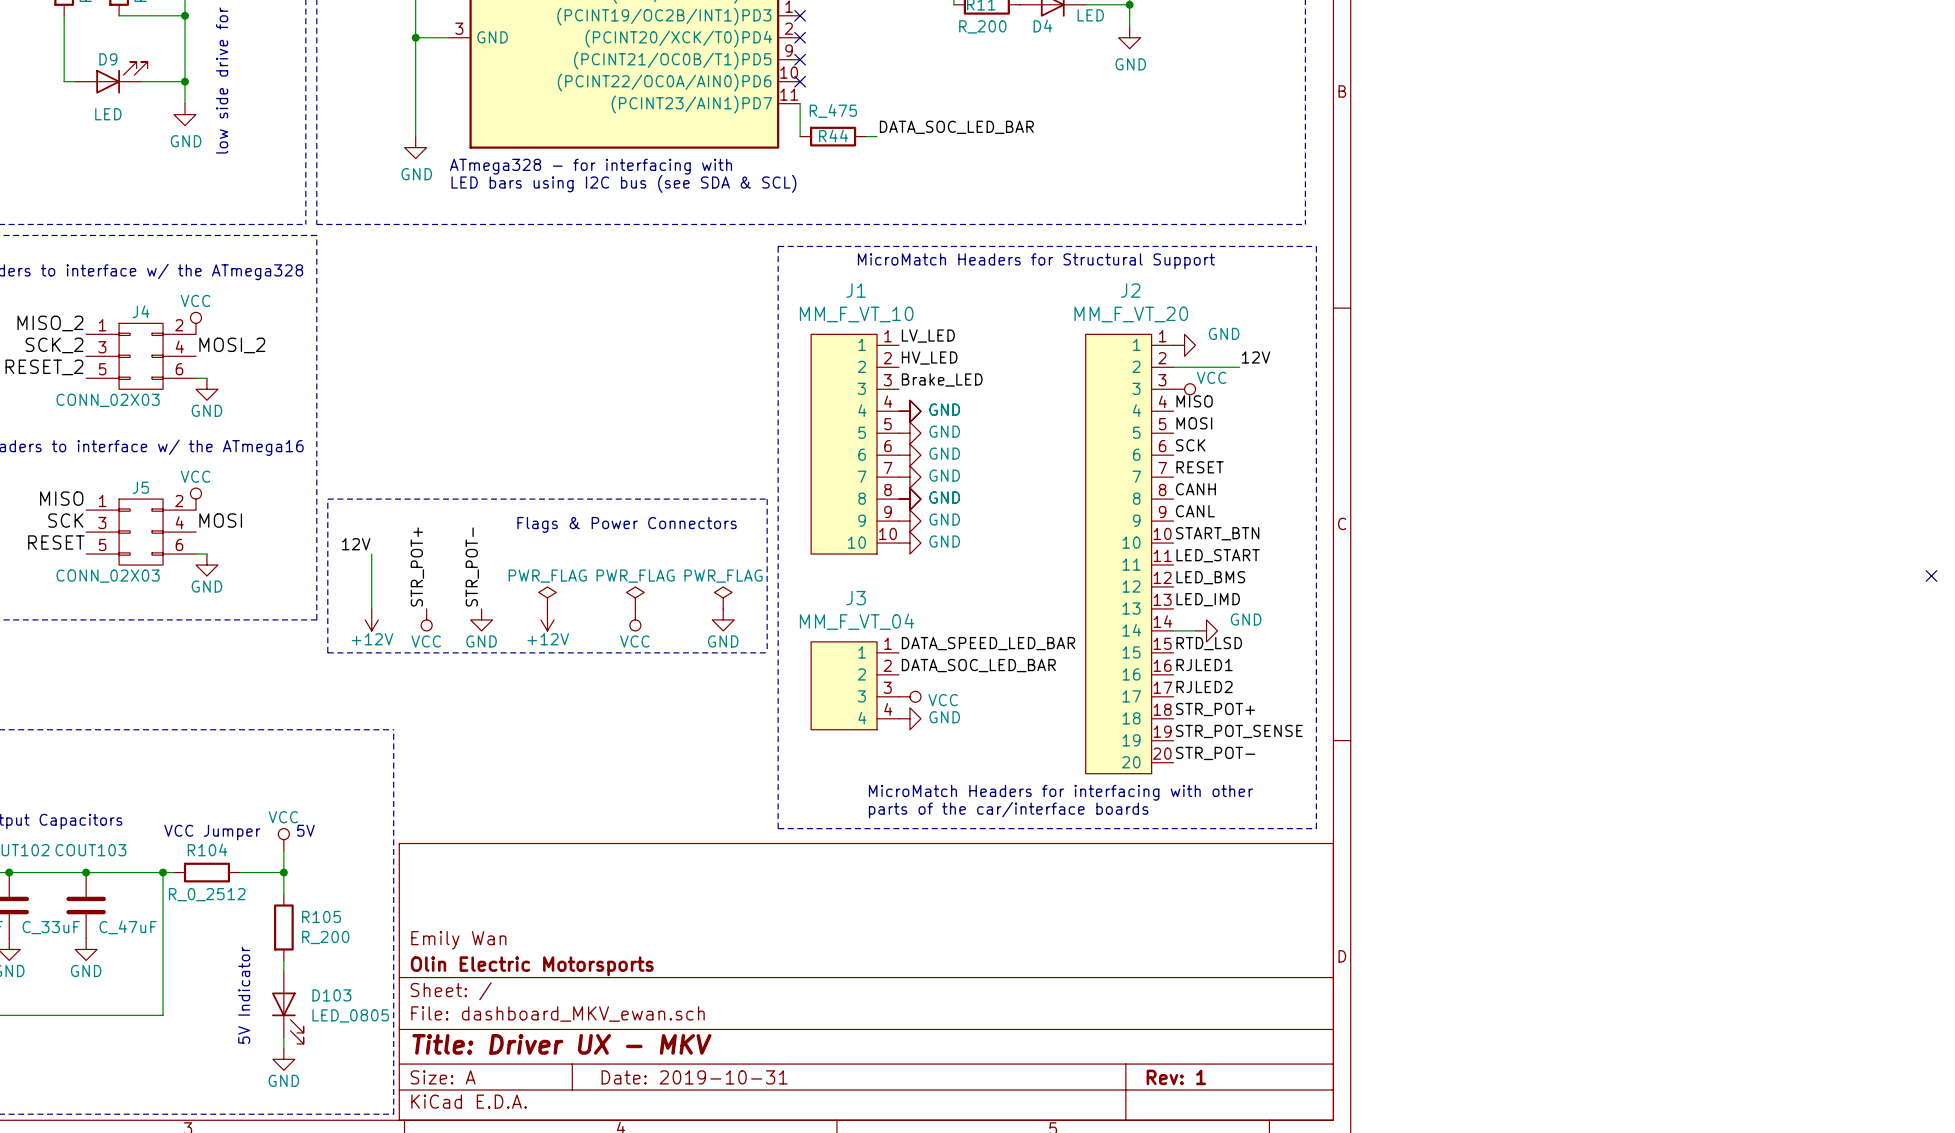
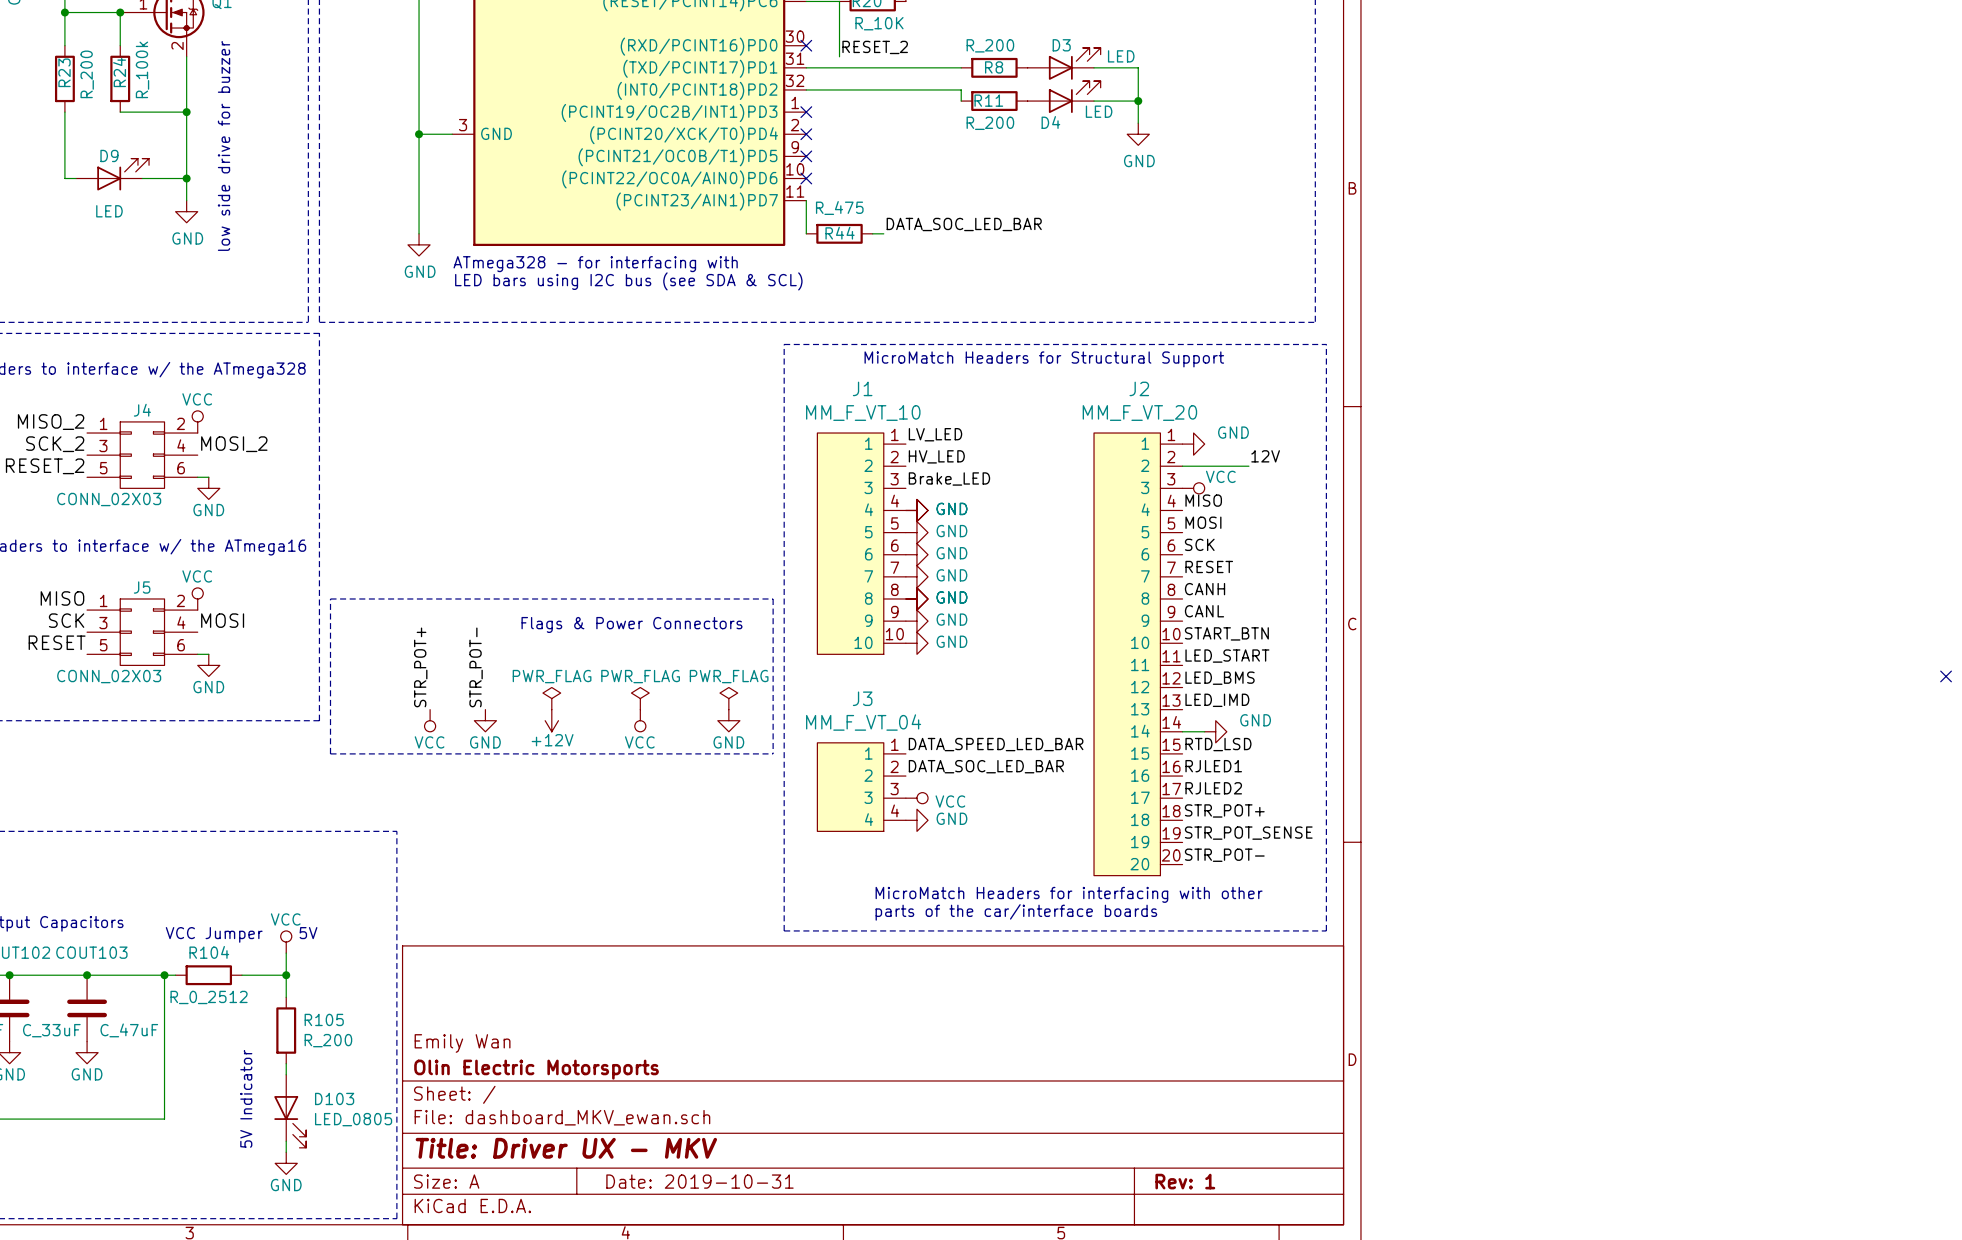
label: 12V (356, 544) -> none
wire: (371, 554) (371, 608) -> none
power symbol: +12V (371, 619) -> none

